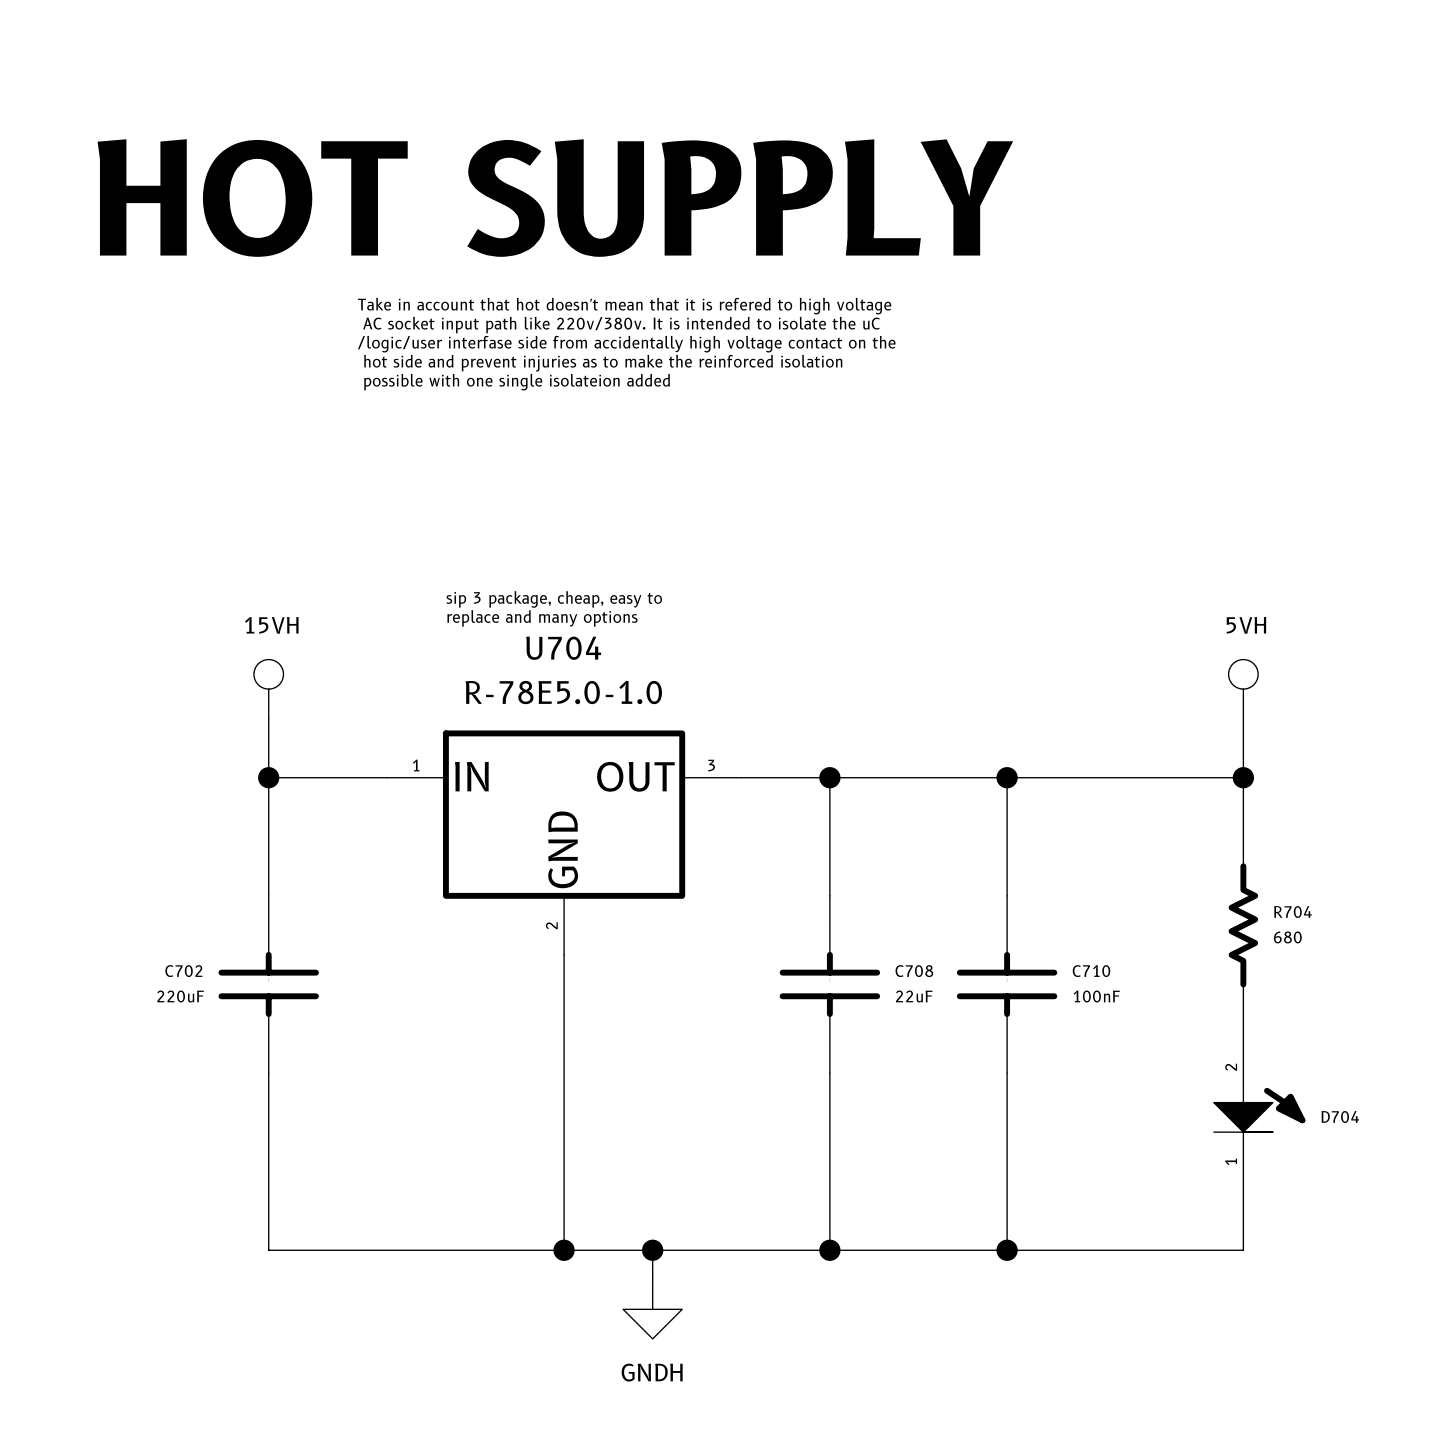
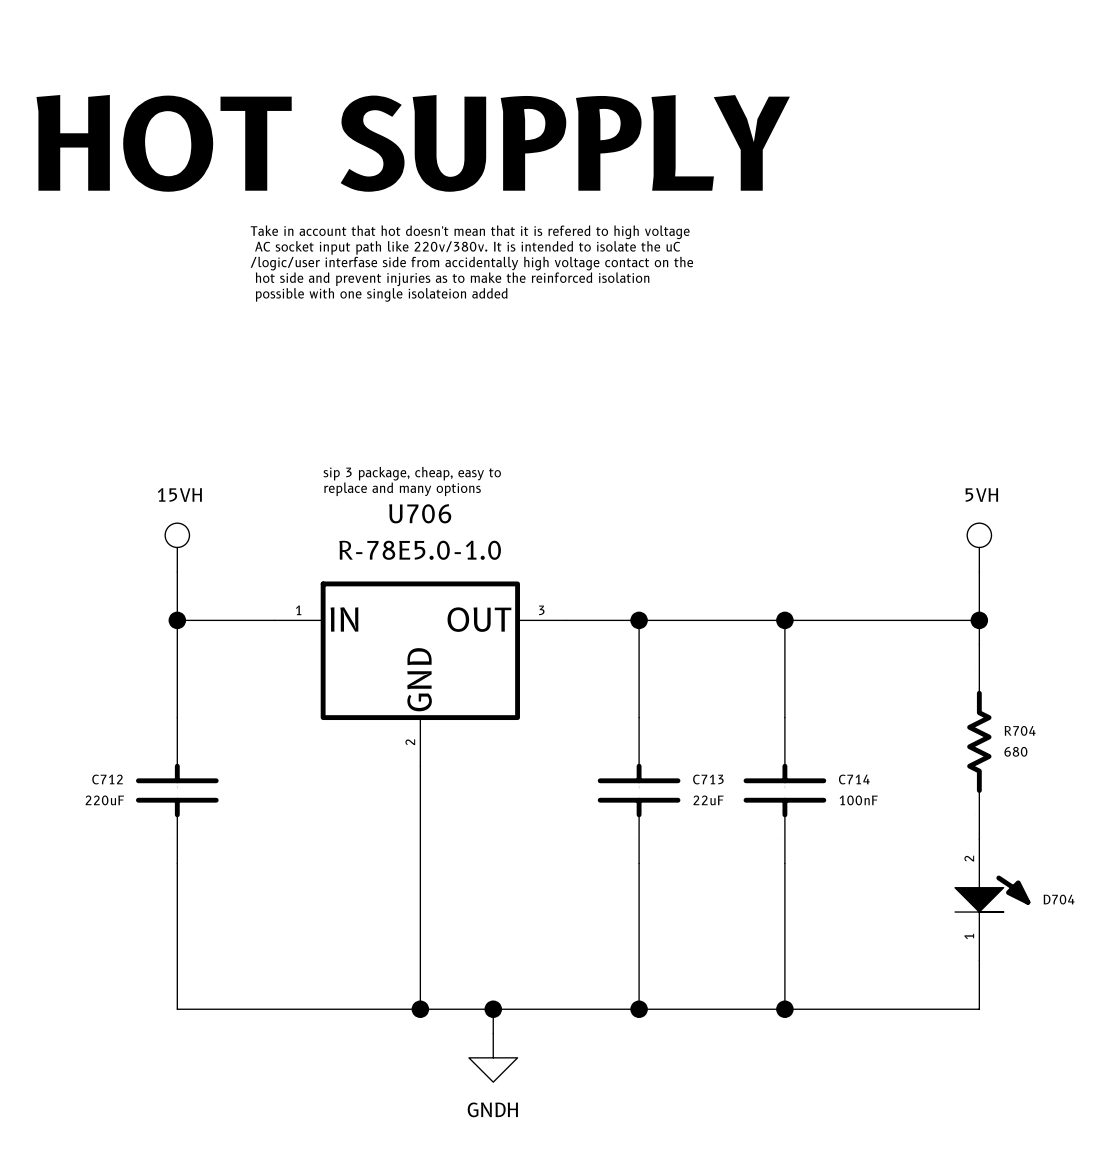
U704 name: U704 (563, 648) -> U706 (420, 513)
C702 name: C702 (183, 971) -> C712 (107, 779)
C708 name: C708 (914, 971) -> C713 (708, 779)
C710 name: C710 (1091, 971) -> C714 (854, 779)

